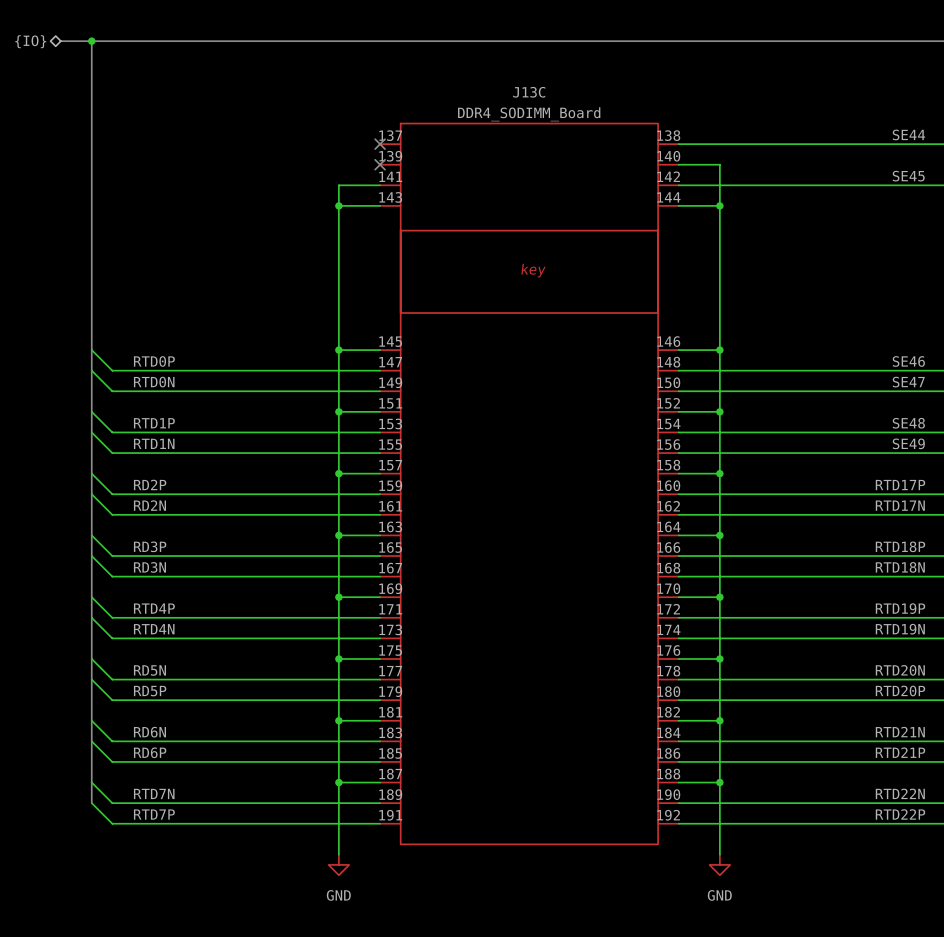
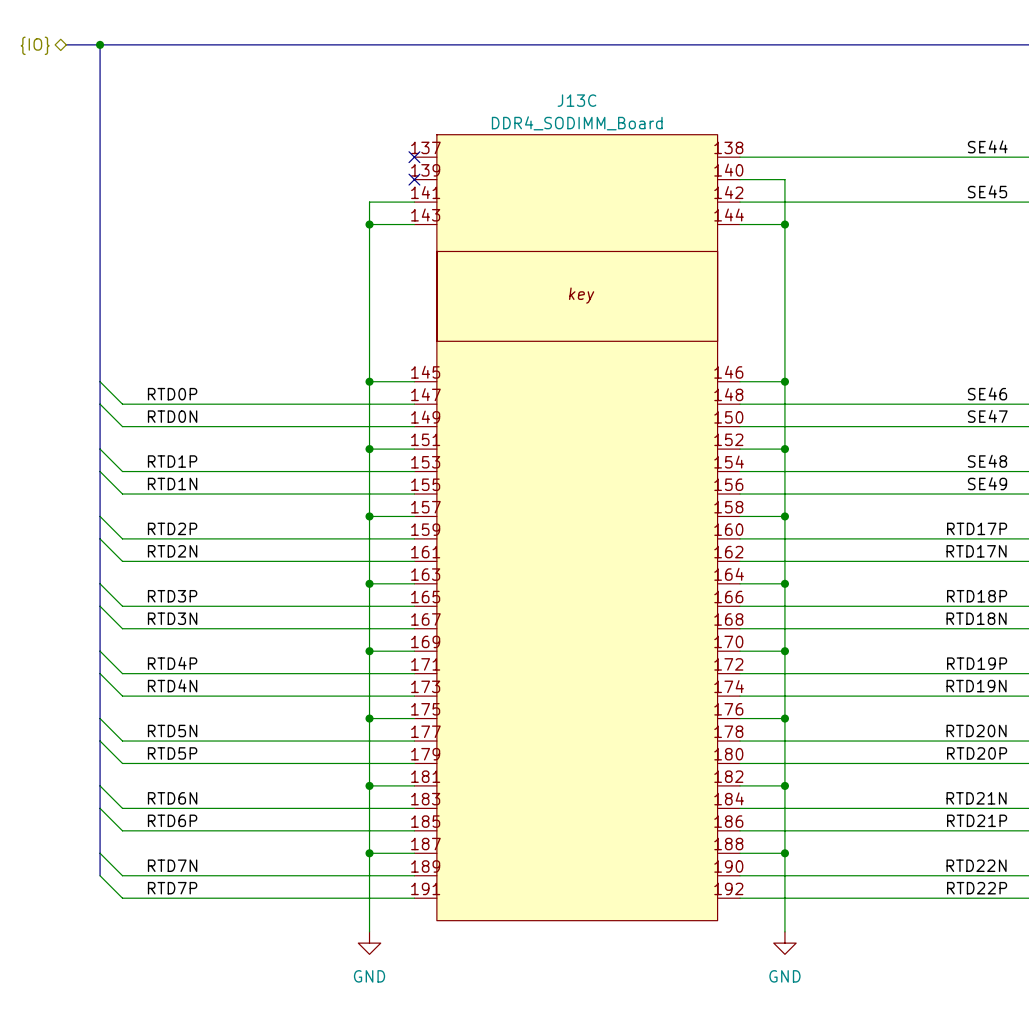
label: RD2P (150, 484) -> RTD2P (172, 528)
label: RD2N (149, 505) -> RTD2N (172, 551)
label: RD3P (150, 546) -> RTD3P (172, 596)
label: RD3N (149, 567) -> RTD3N (172, 618)
label: RD5N (149, 670) -> RTD5N (172, 730)
label: RD5P (150, 691) -> RTD5P (172, 753)
label: RD6N (149, 732) -> RTD6N (172, 798)
label: RD6P (150, 752) -> RTD6P (172, 820)

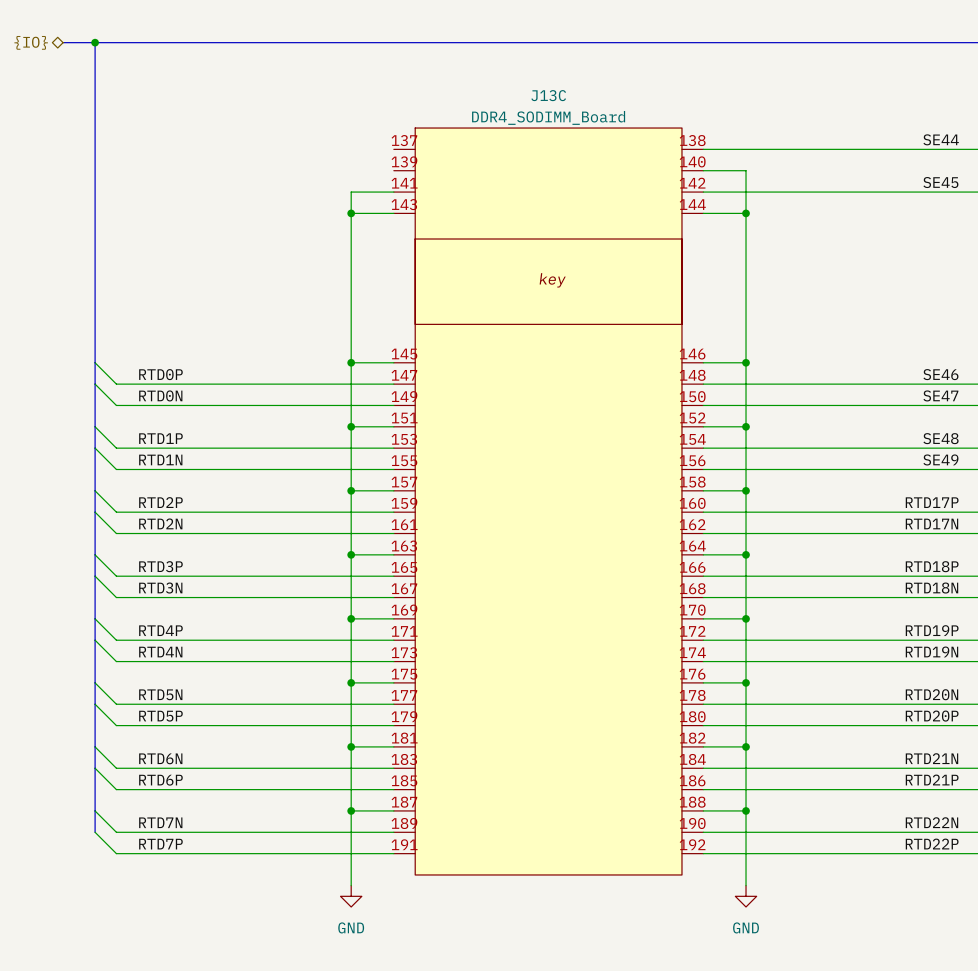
no-connect mark: (414, 157) -> none
no-connect mark: (414, 179) -> none

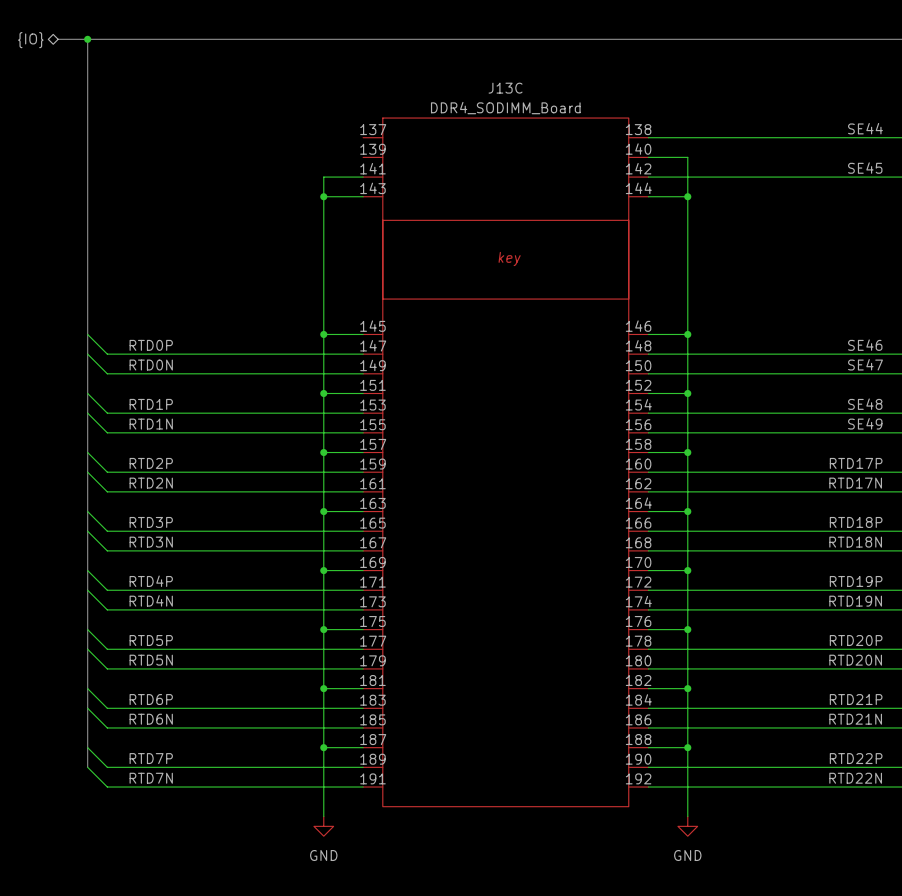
label: RTD5N (160, 694) -> RTD5P (151, 640)
label: RTD20N (931, 694) -> RTD20P (856, 640)
label: RTD5P (160, 716) -> RTD5N (151, 660)
label: RTD20P (932, 716) -> RTD20N (855, 660)
label: RTD6N (160, 758) -> RTD6P (151, 699)
label: RTD21N (931, 758) -> RTD21P (856, 699)
label: RTD6P (160, 780) -> RTD6N (151, 719)
label: RTD21P (932, 780) -> RTD21N (855, 719)
label: RTD7N (160, 822) -> RTD7P (151, 758)
label: RTD22N (931, 822) -> RTD22P (856, 758)
label: RTD7P (160, 844) -> RTD7N (151, 778)
label: RTD22P (932, 844) -> RTD22N (855, 778)

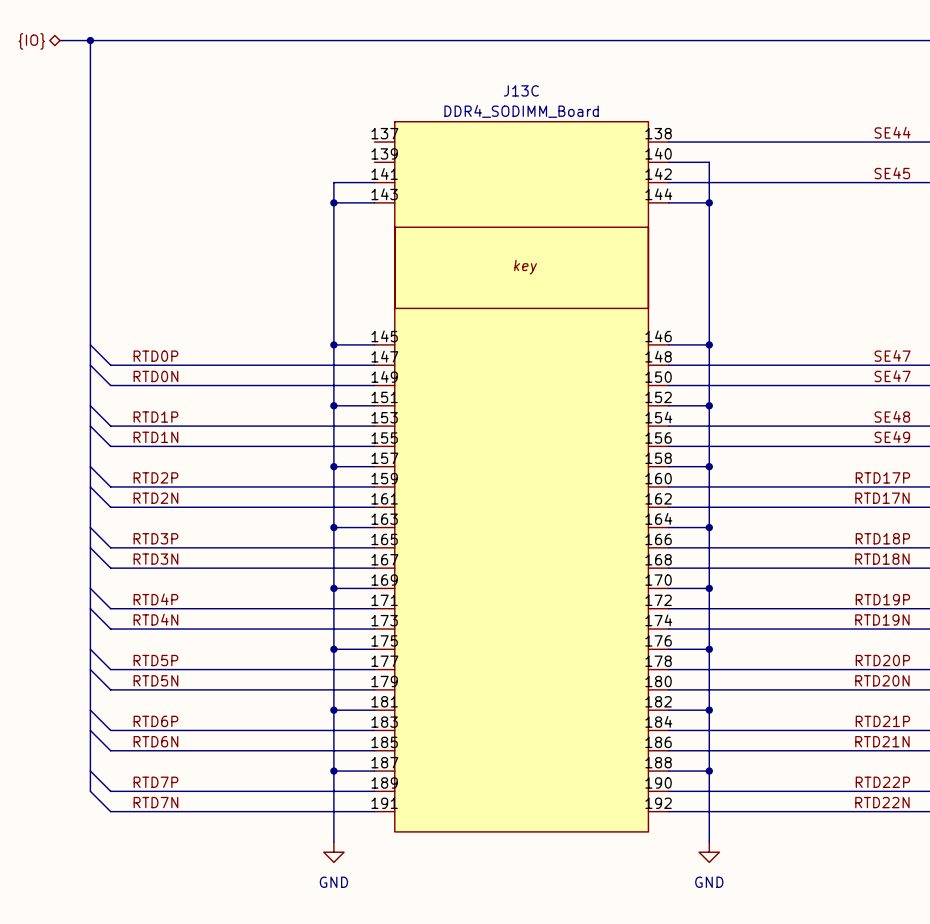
label: SE46 (865, 345) -> SE47 (892, 355)

